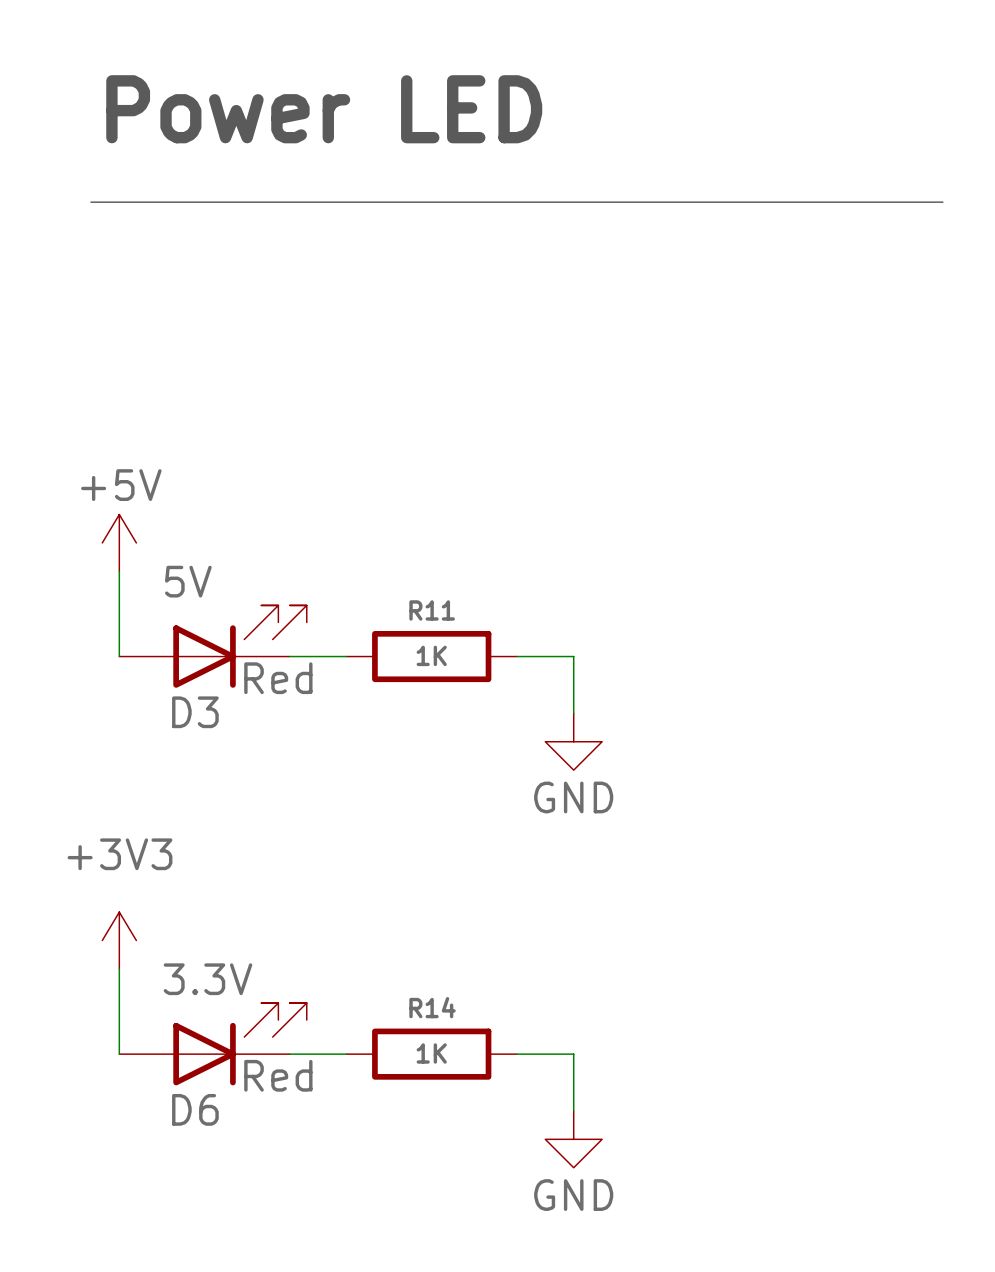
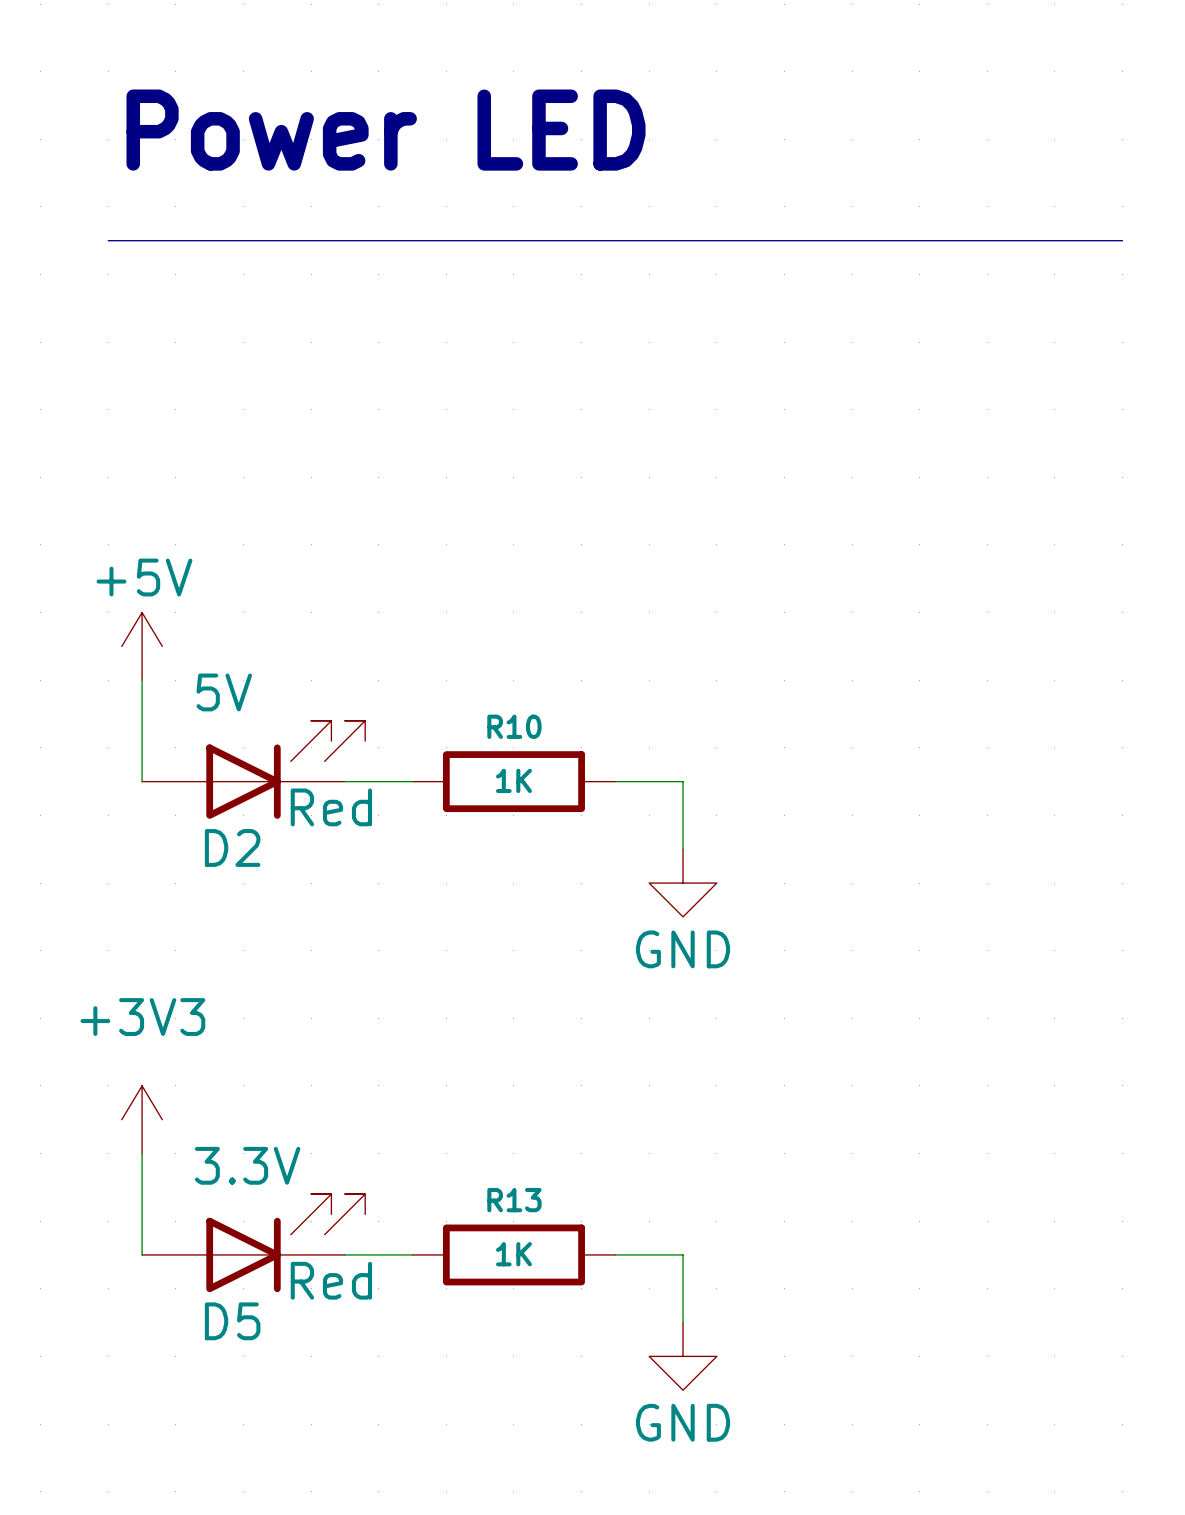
R11 name: R11 (432, 610) -> R10 (514, 726)
D3 name: D3 (195, 712) -> D2 (232, 847)
R14 name: R14 (432, 1007) -> R13 (514, 1200)
D6 name: D6 (195, 1109) -> D5 (232, 1321)

